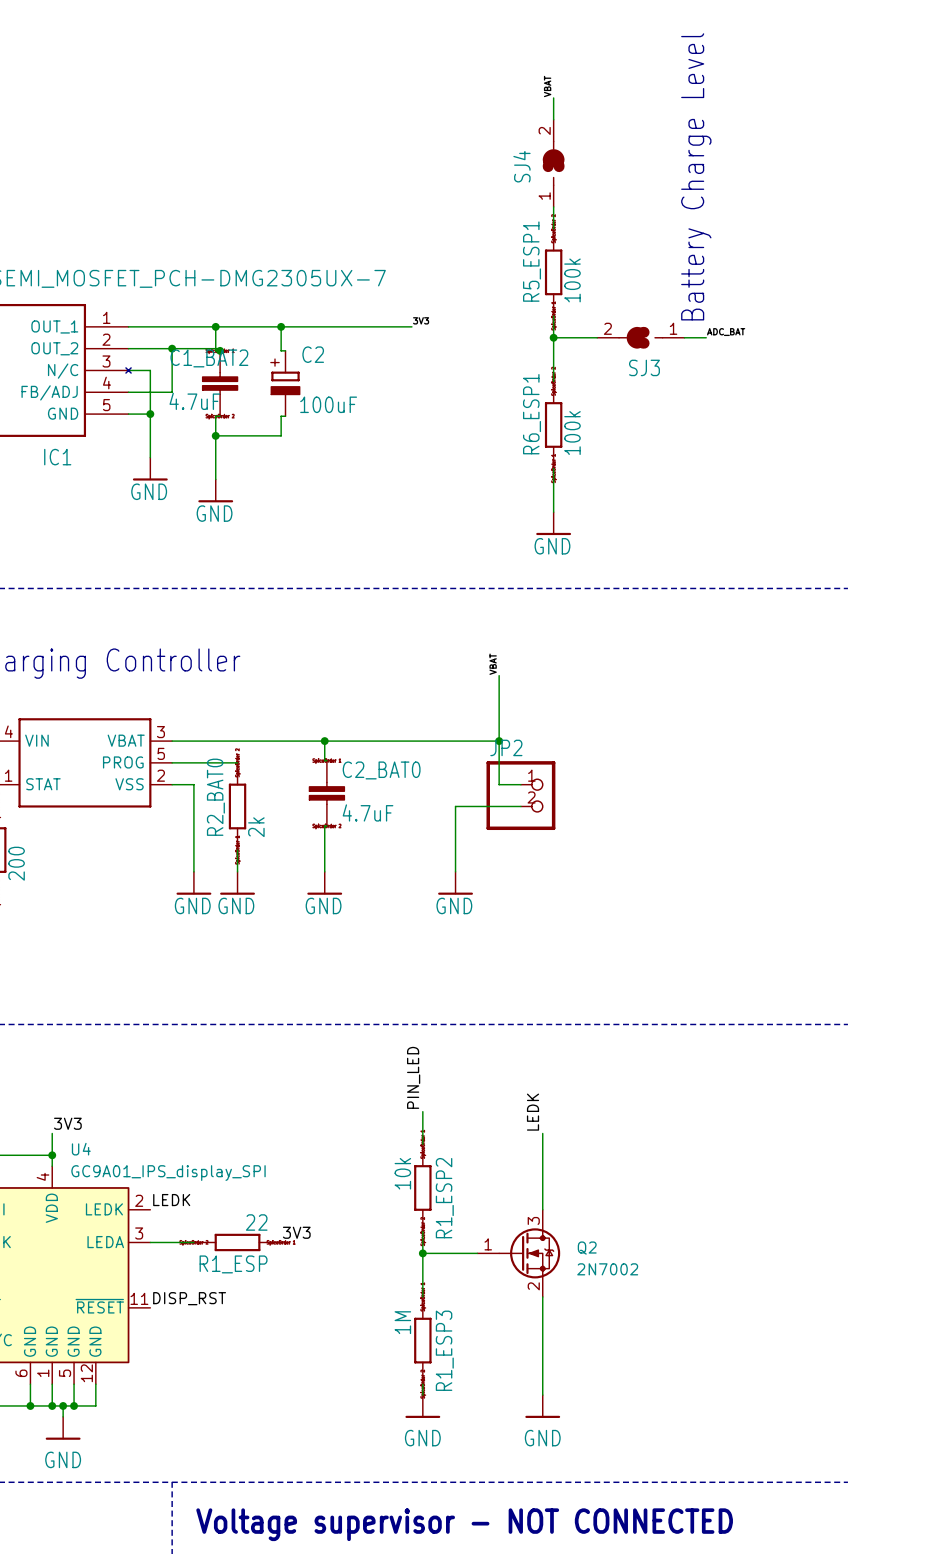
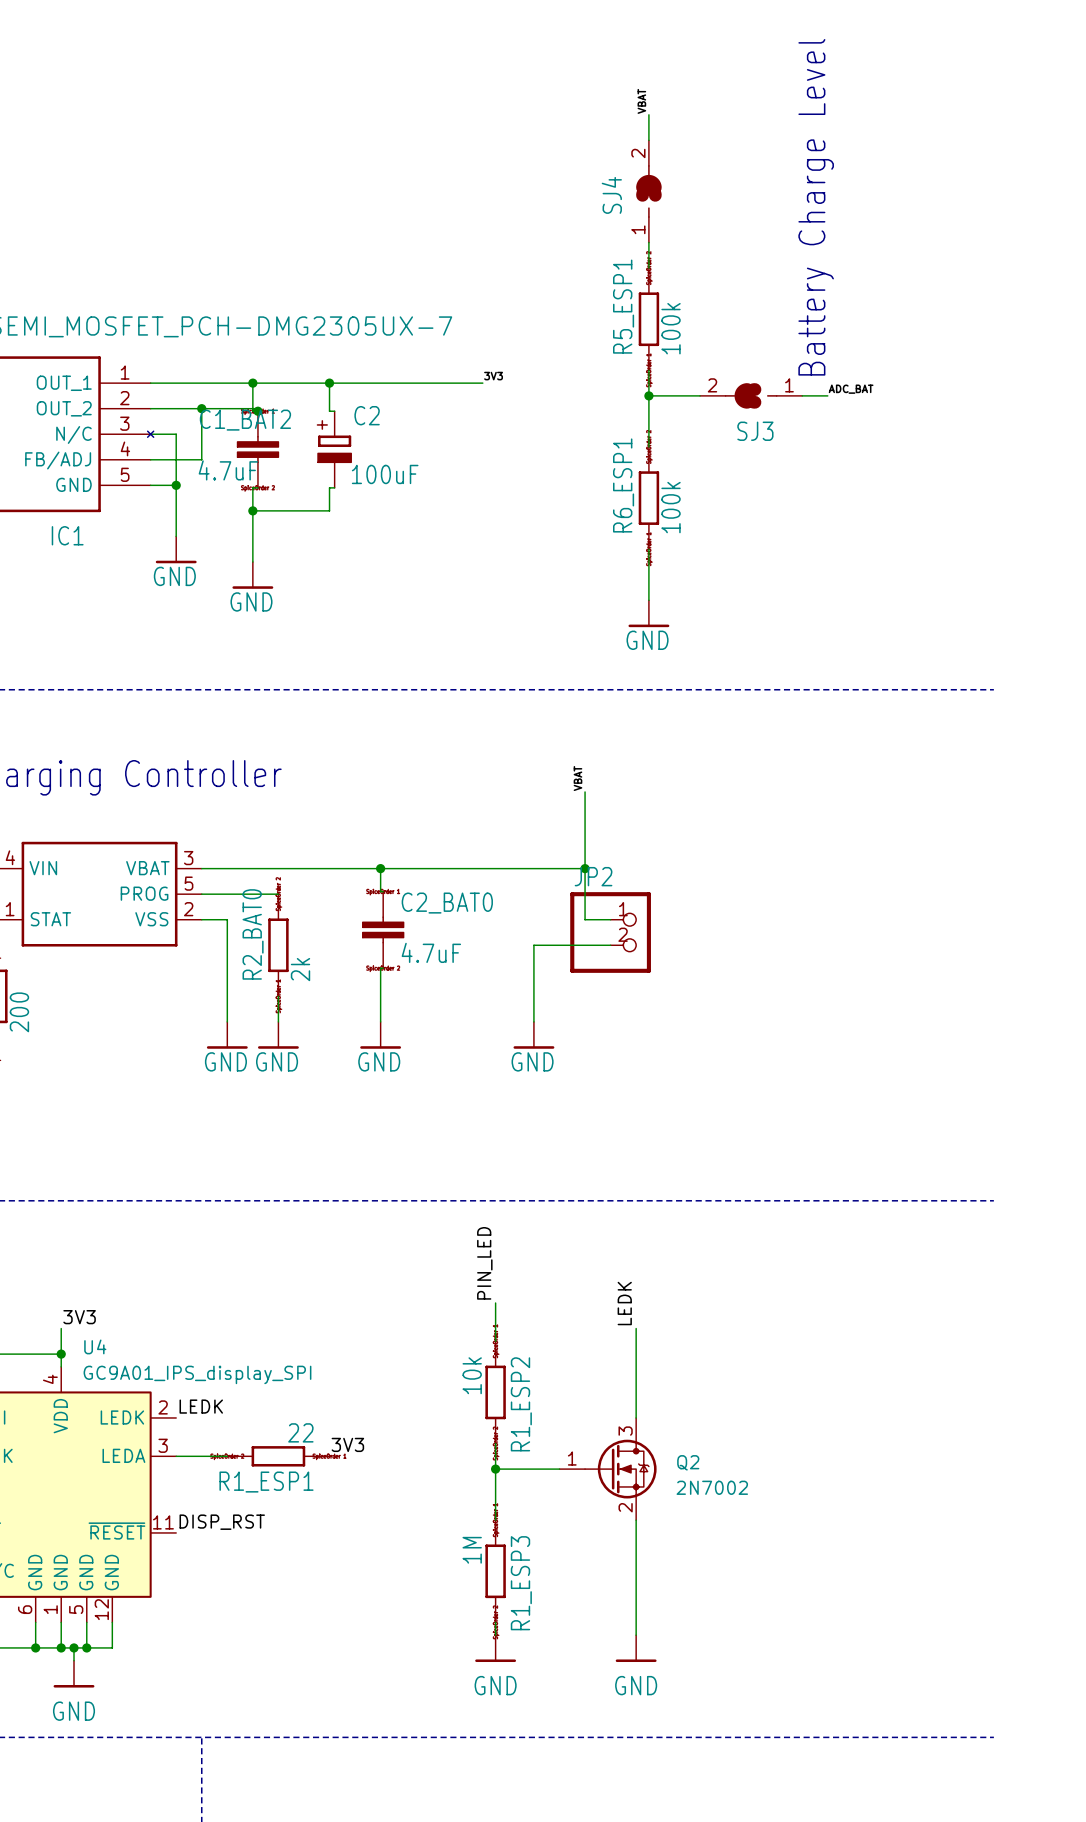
R1_ESP name: R1_ESP (233, 1264) -> R1_ESP1 (266, 1482)
text: Voltage supervisor - NOT CONNECTED (464, 1524) -> none

